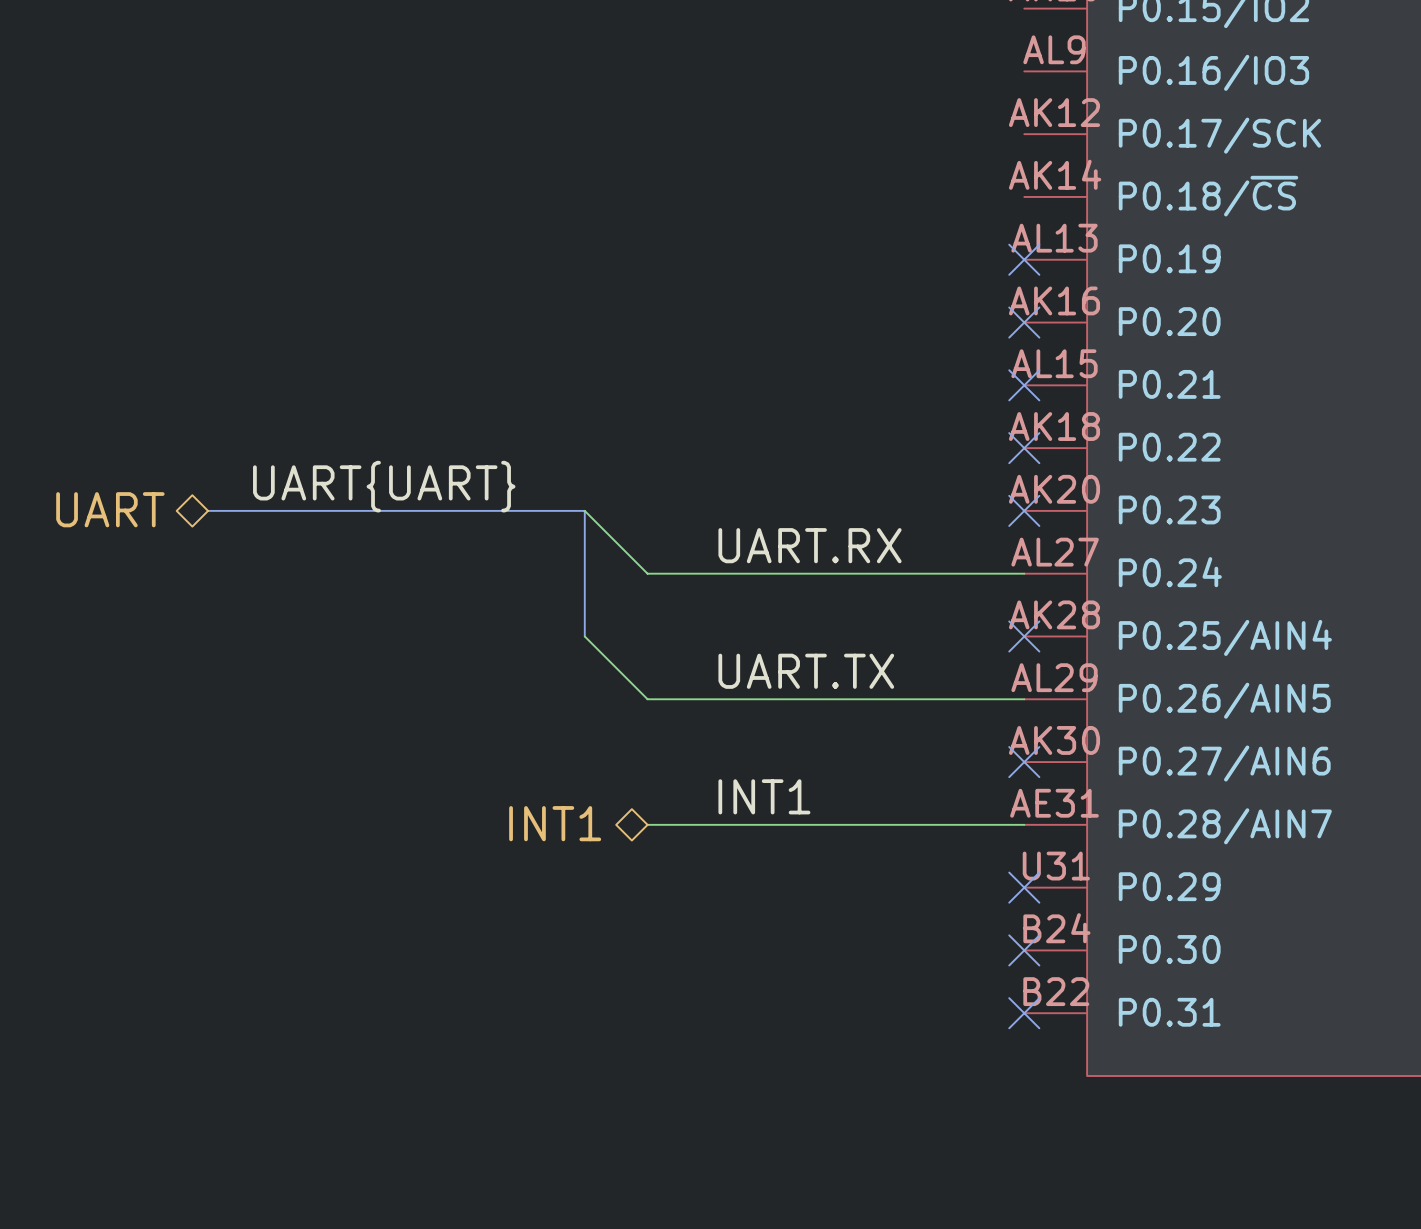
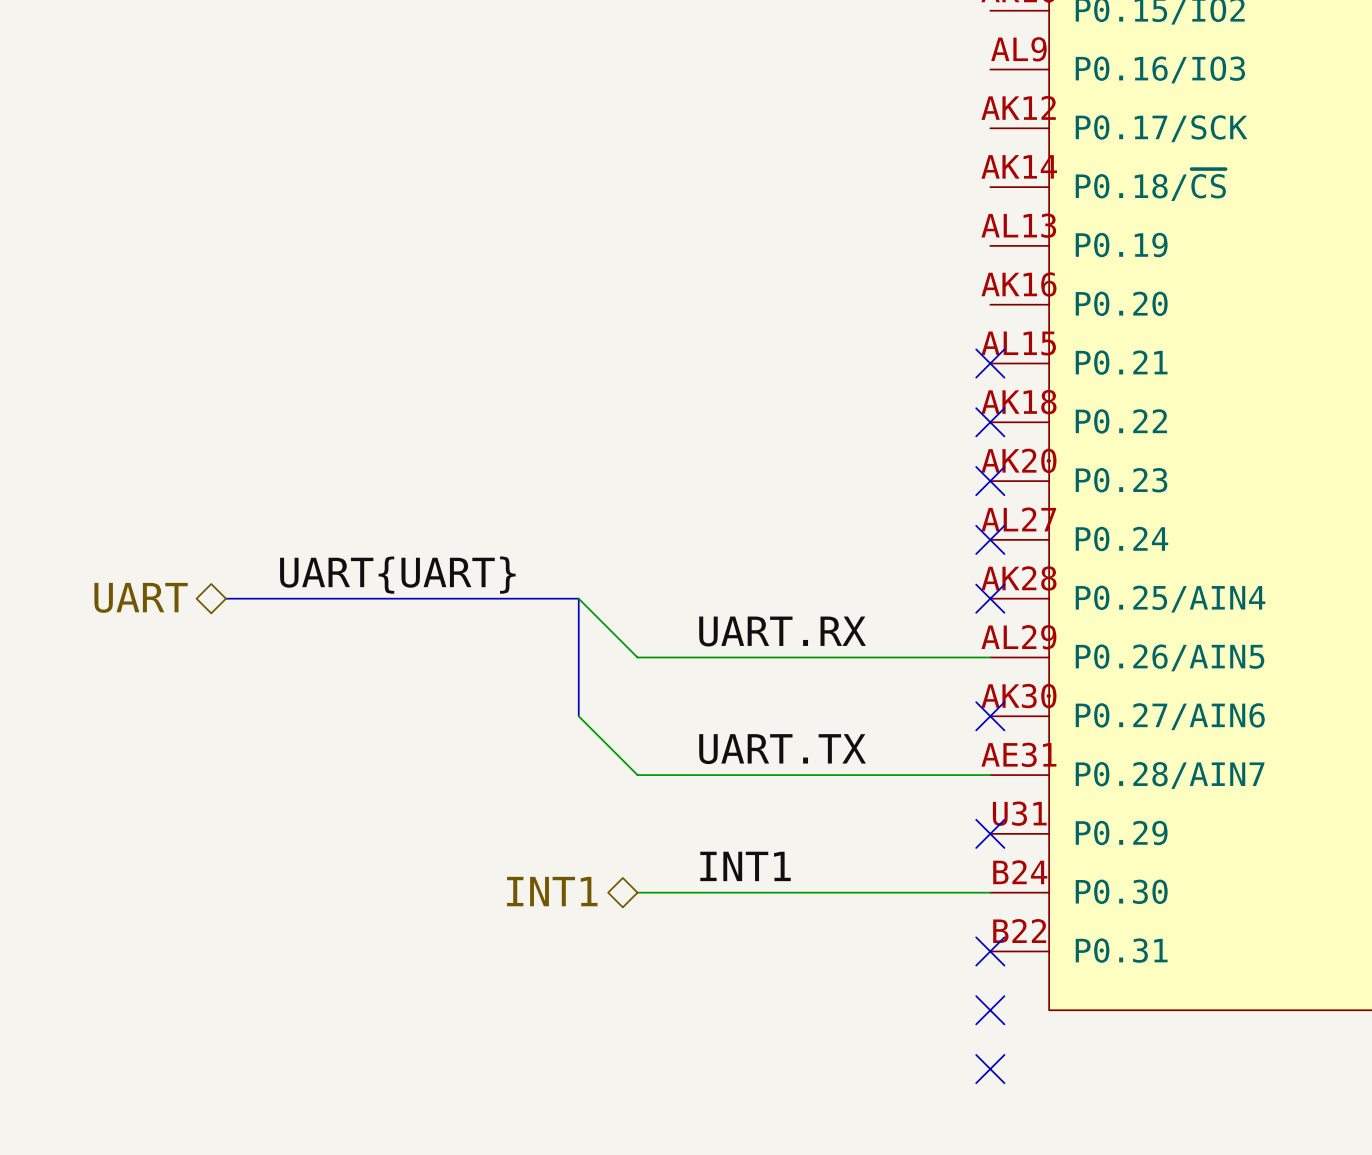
no-connect mark: (1024, 259) -> none
no-connect mark: (1024, 322) -> none
label position: UART{UART} (384, 486) -> UART{UART} (397, 575)
hierarchical label position: UART (110, 509) -> UART (141, 597)
bus: (208, 510) (584, 510) (584, 636) -> (225, 598) (578, 598) (578, 716)
wire: (584, 510) (647, 573) (1024, 573) -> none
label: UART.RX (810, 545) -> none
no-connect mark: none -> (990, 539)
label: UART.TX (806, 671) -> UART.RX (782, 631)
wire: none -> (578, 716) (637, 775)
label: INT1 (764, 796) -> UART.TX (782, 749)
hierarchical label position: INT1 (555, 823) -> INT1 (552, 891)
label: none -> INT1 (745, 866)
wire: none -> (637, 892) (990, 892)
no-connect mark: (1024, 950) -> none
no-connect mark: none -> (990, 1010)
no-connect mark: none -> (990, 1069)

